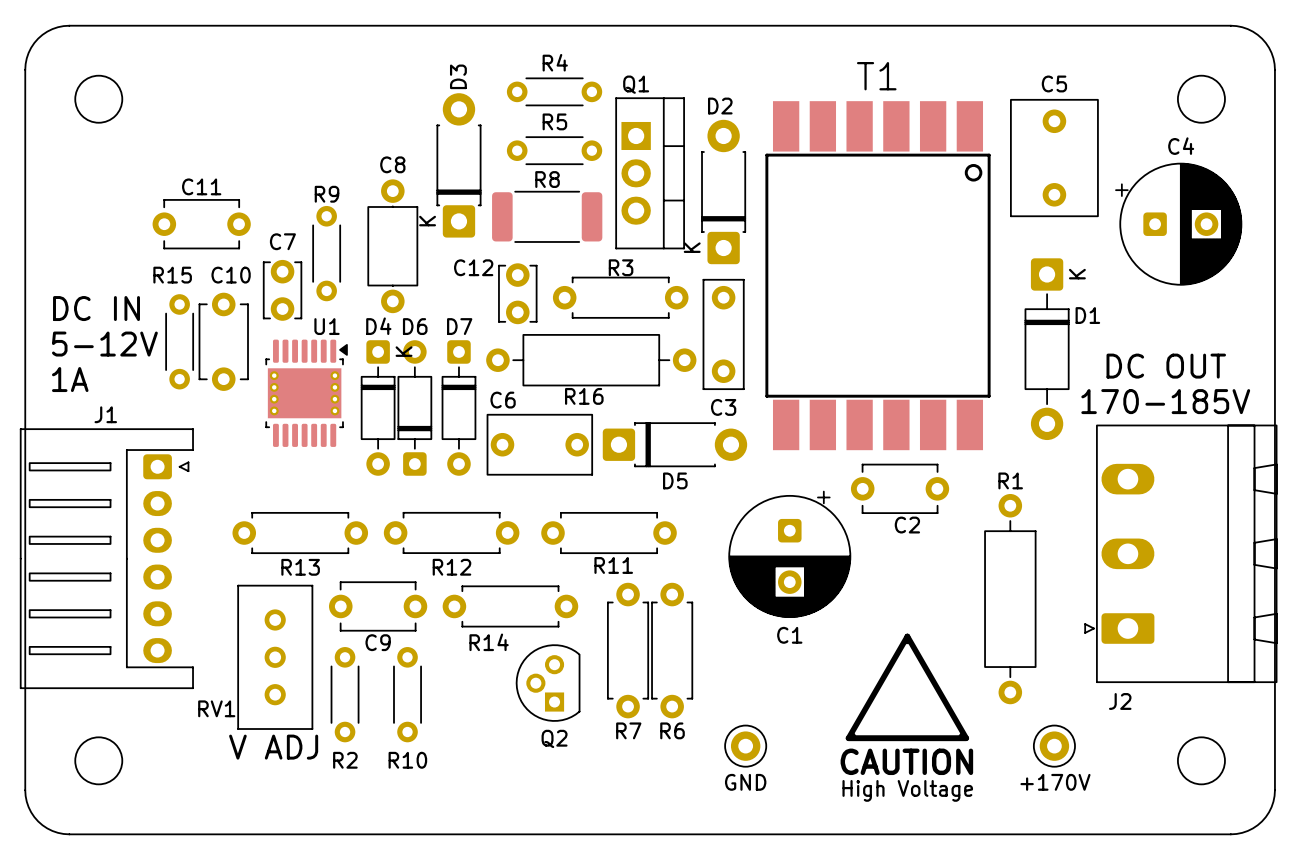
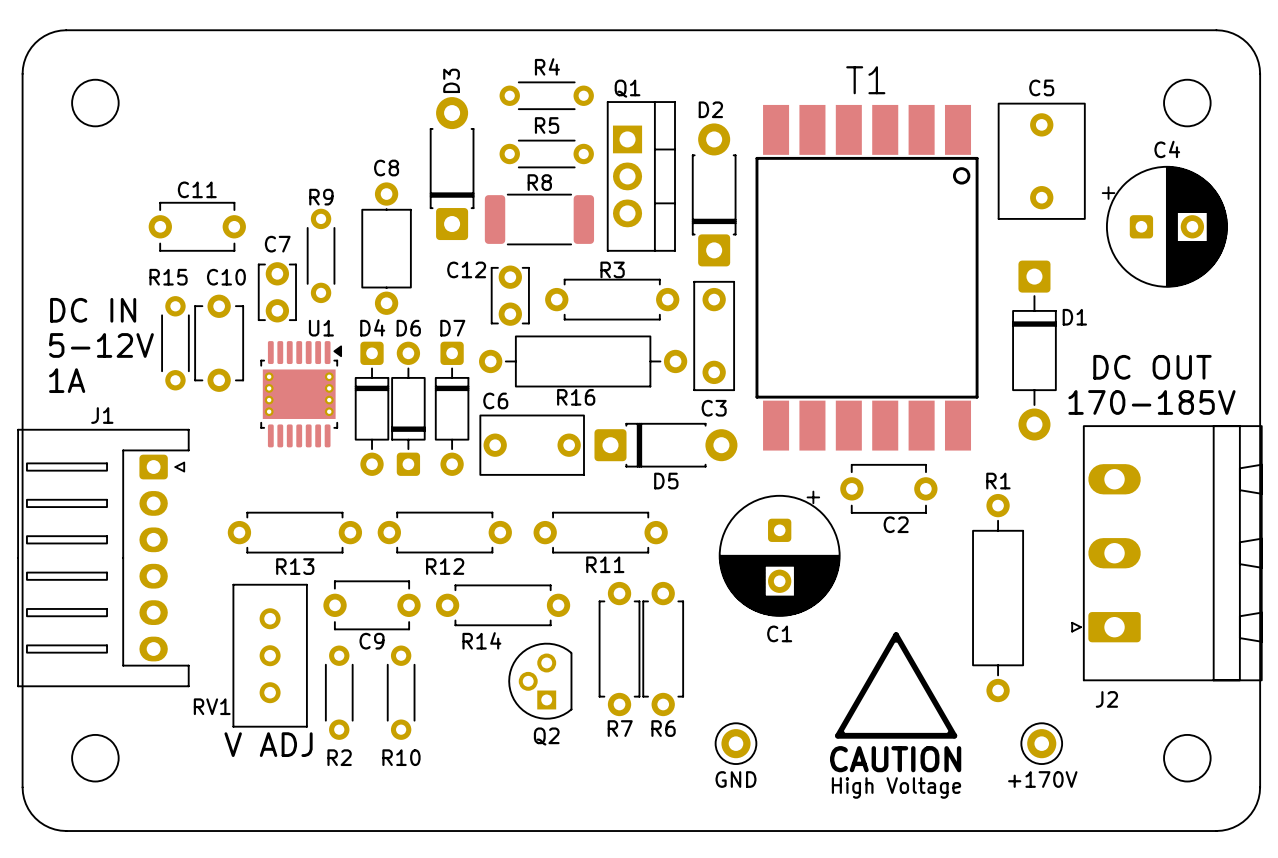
D3 text: K (427, 221) -> none
D2 text: K (692, 247) -> none
D1 text: K (1077, 274) -> none
D4 text: K (404, 351) -> none

